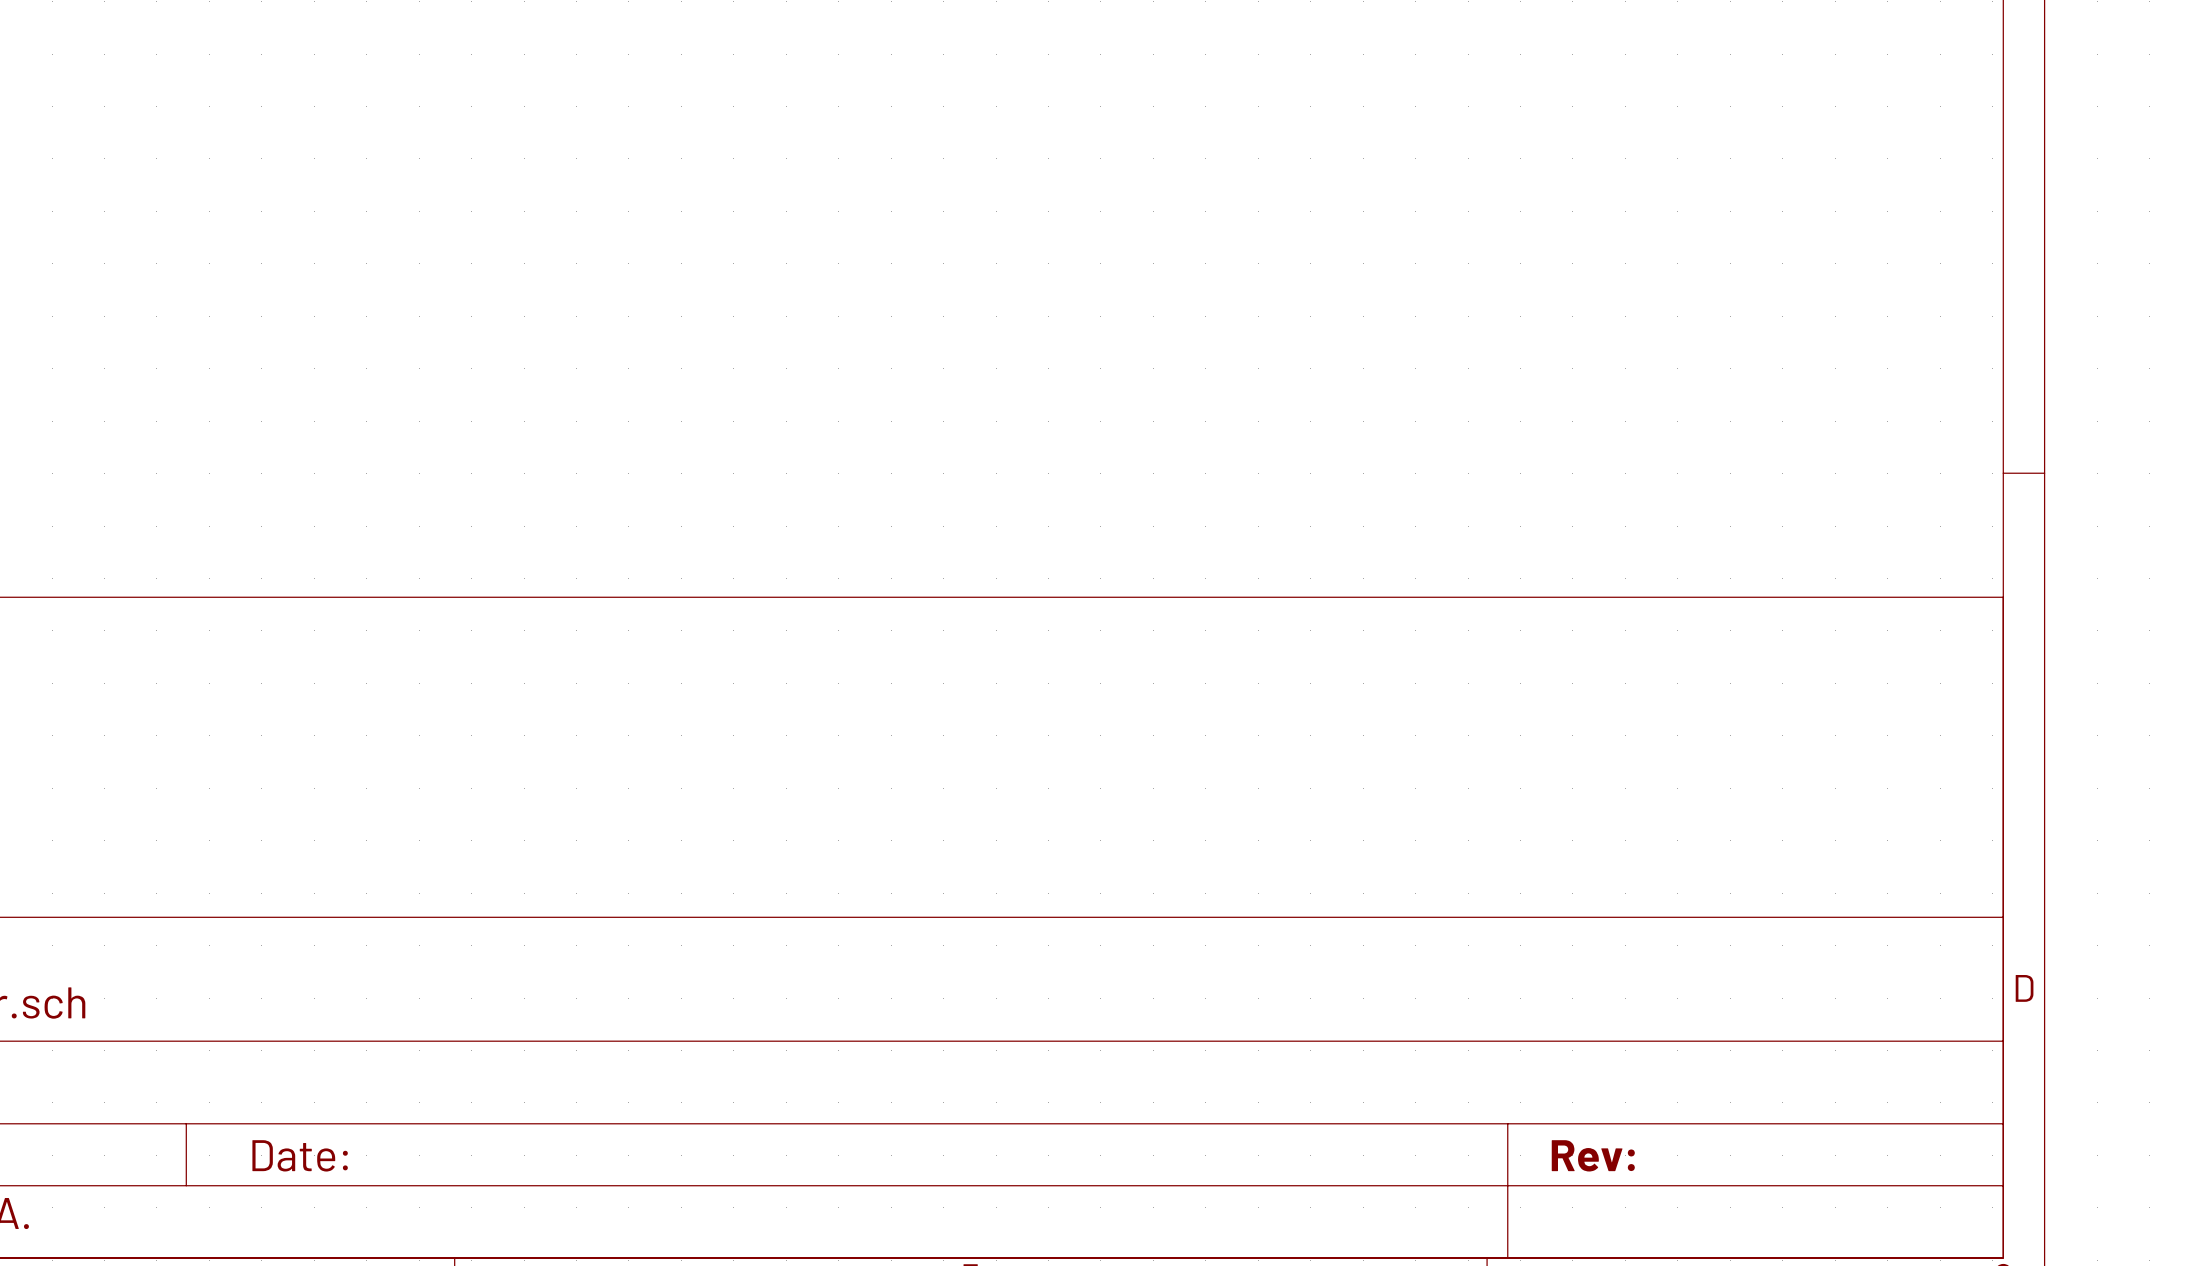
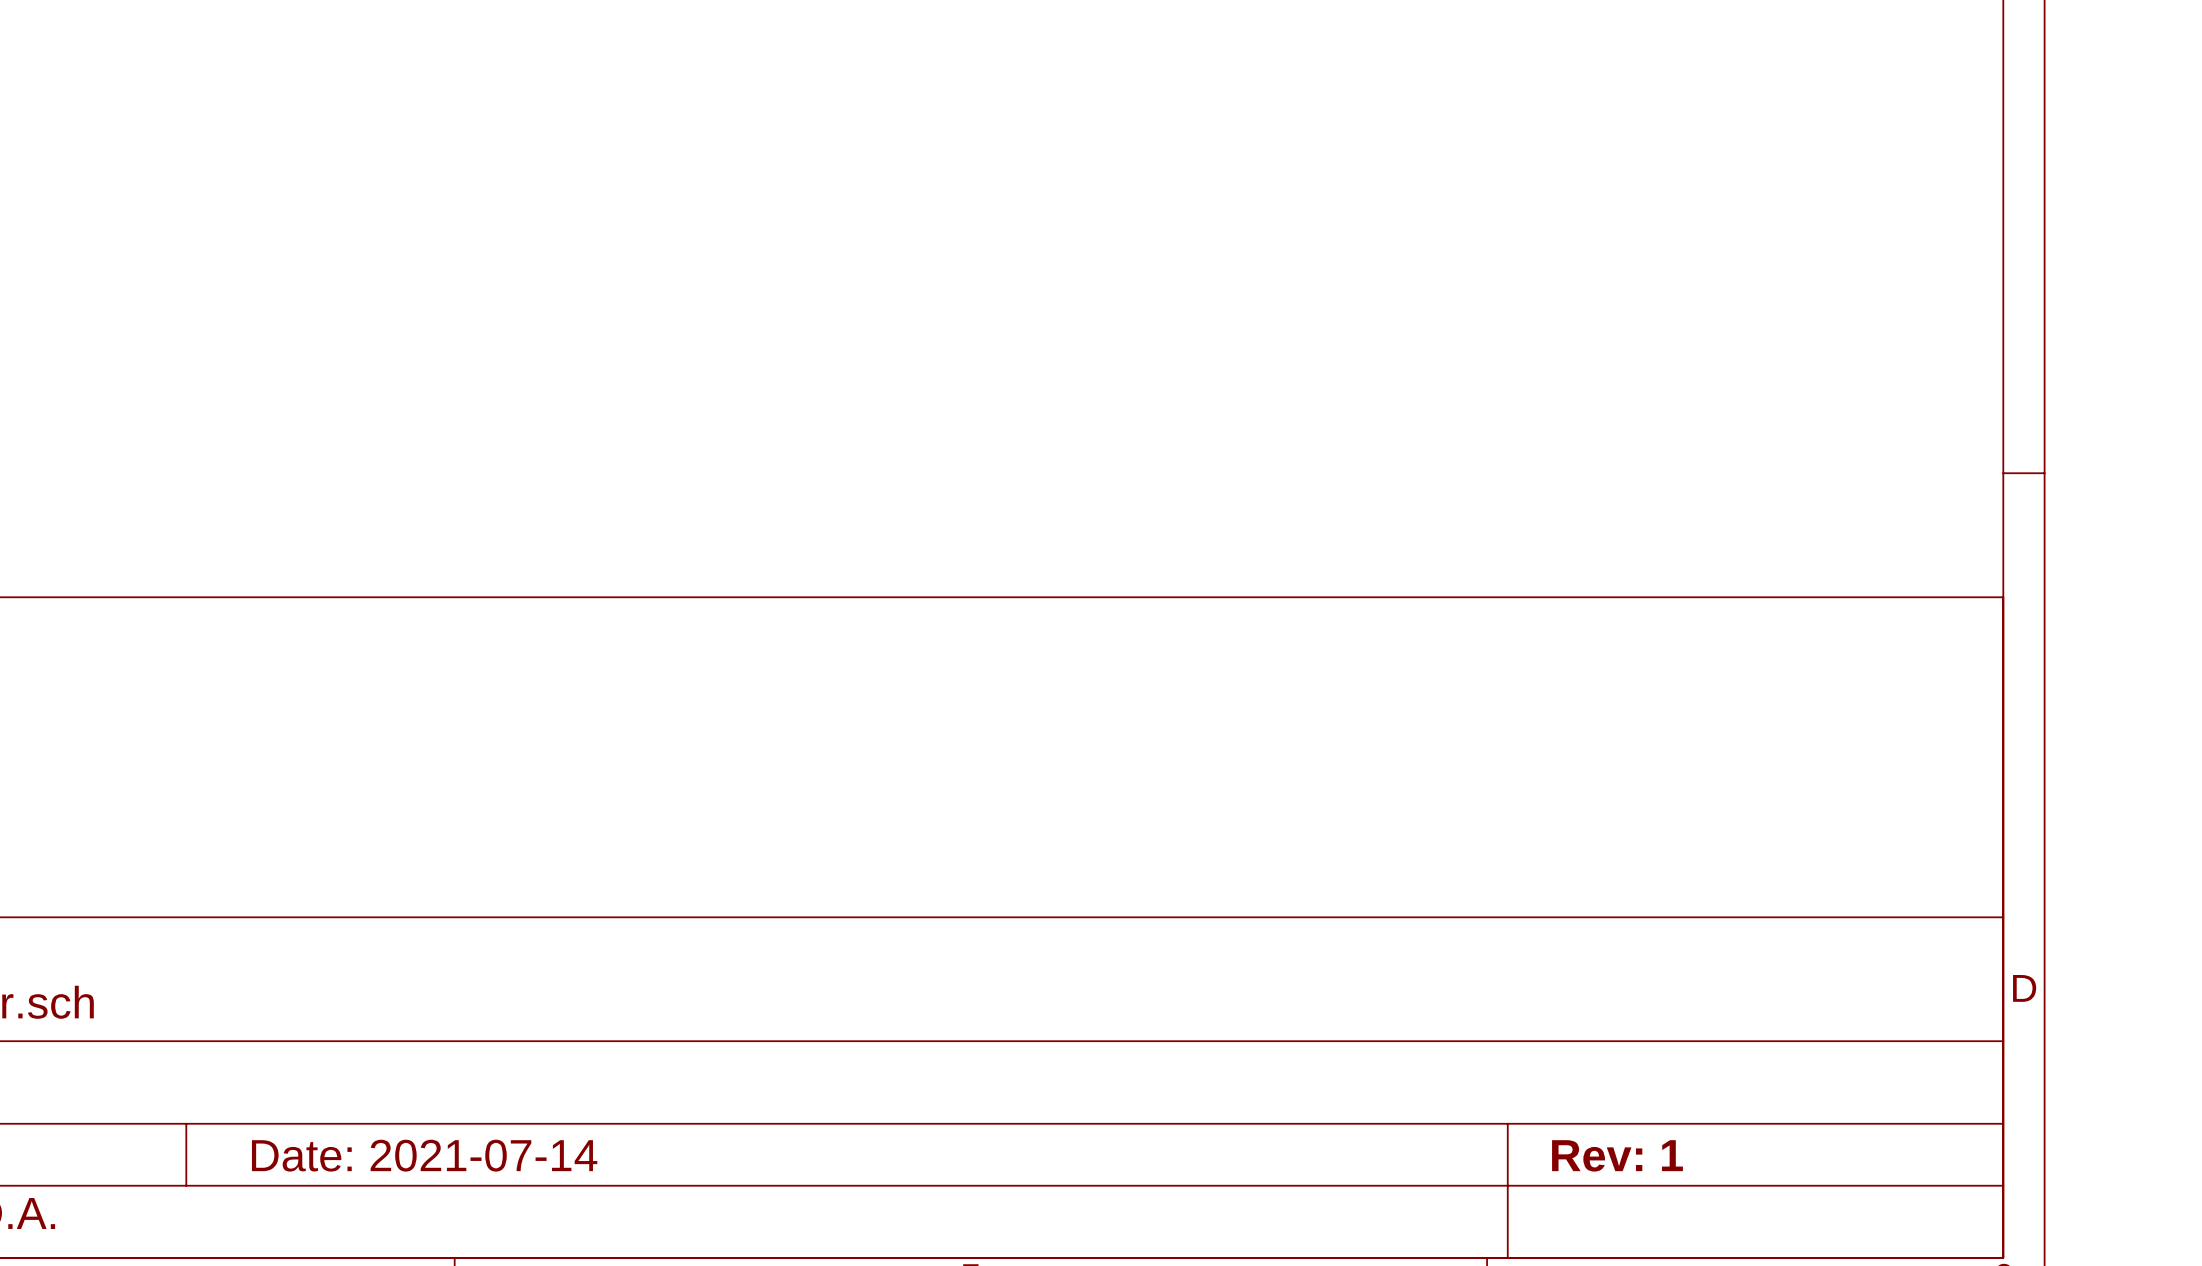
title block: Date: (300, 1155) -> Date: 2021-07-14 (424, 1155)
title block: Rev: (1593, 1155) -> Rev: 1 (1617, 1155)

